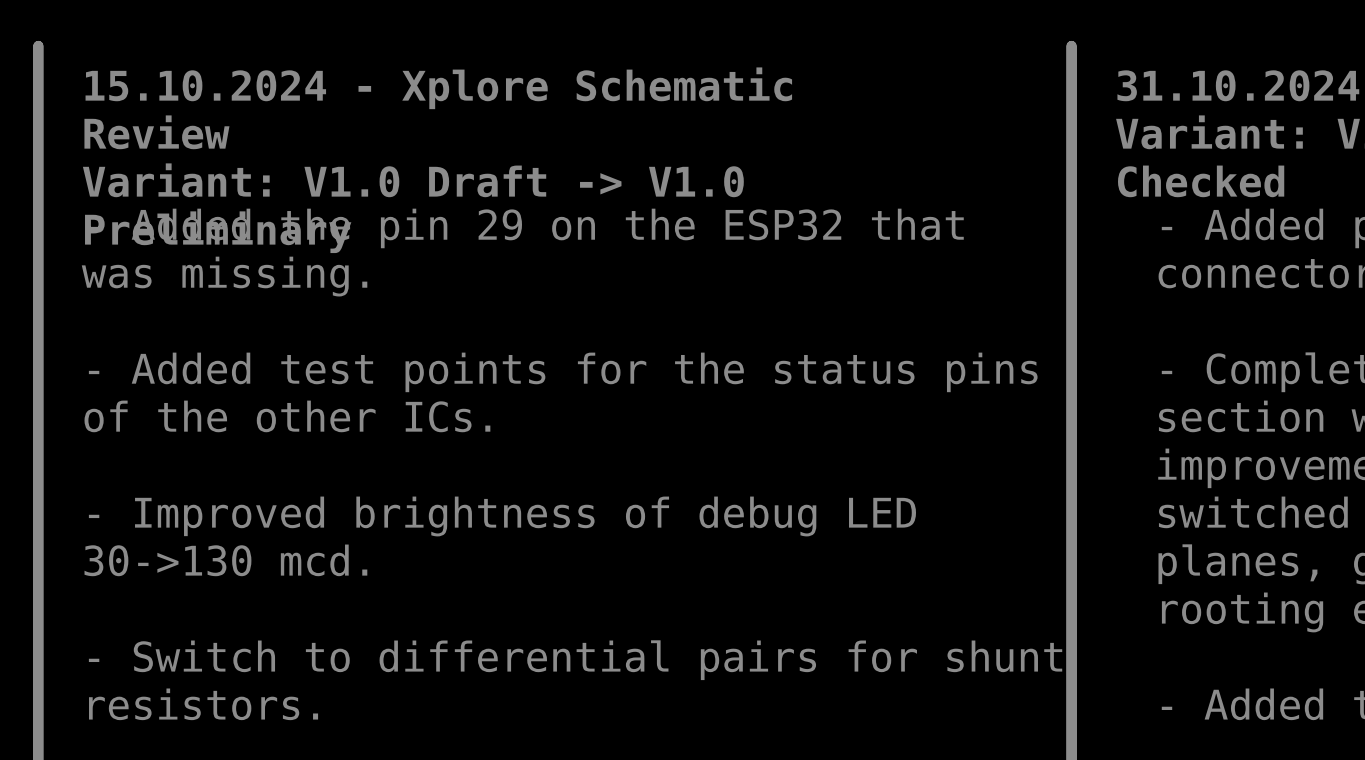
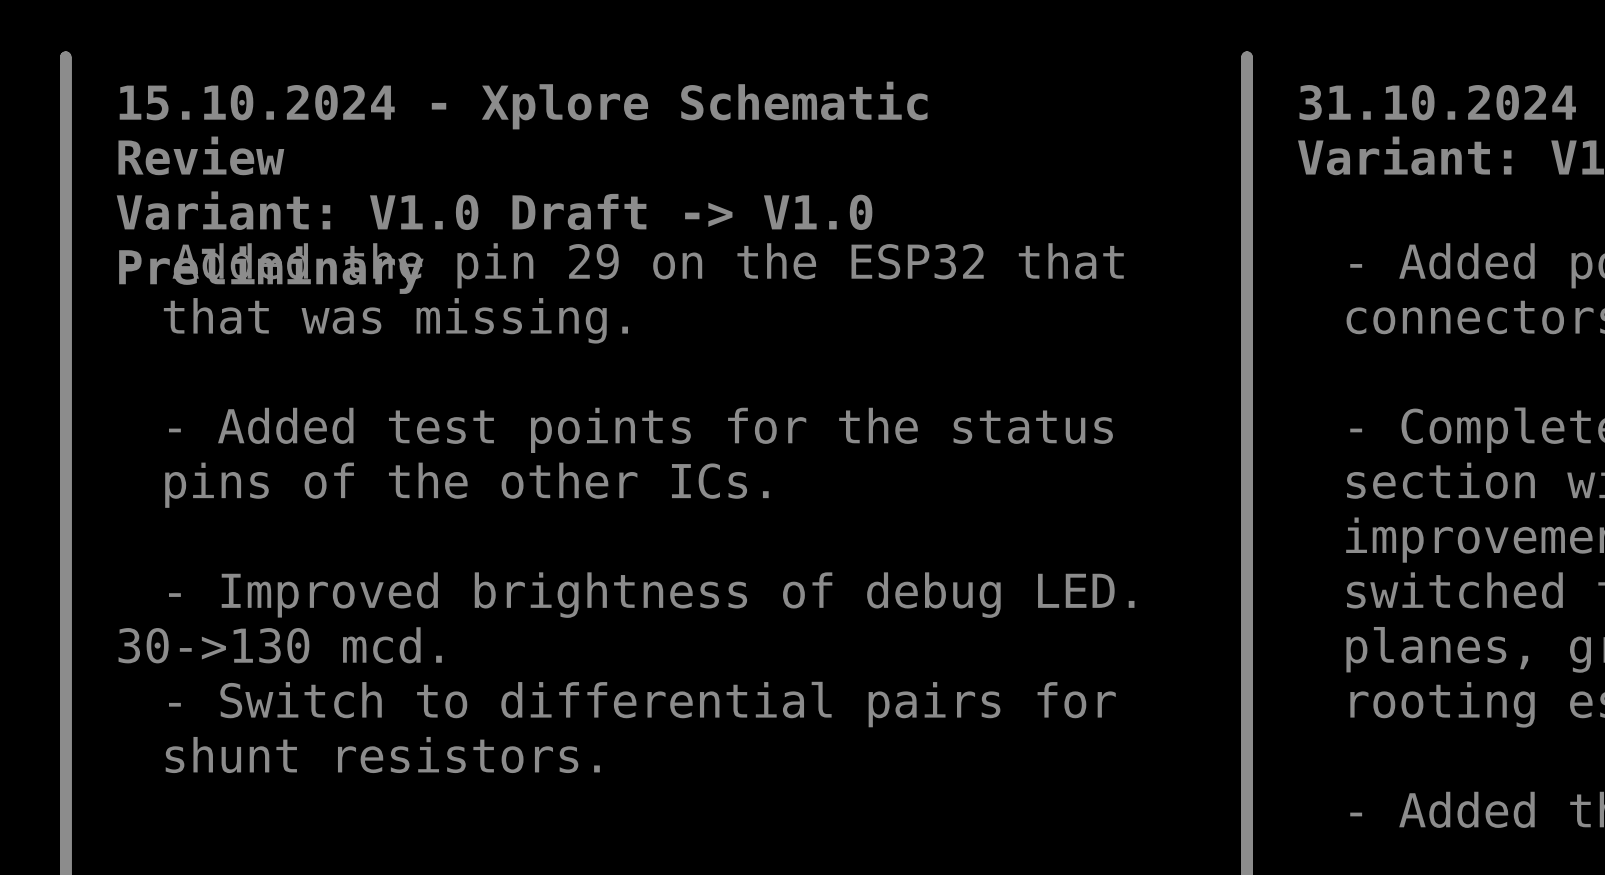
text: Checked (1201, 181) -> none
text: was missing. (224, 276) -> that was missing. (395, 320)
text: - Added test points for the status pins (563, 372) -> - Added test points for the status (640, 430)
text: of the other ICs. (287, 416) -> pins of the other ICs. (466, 485)
text: - Improved brightness of debug LED (502, 516) -> - Improved brightness of debug LED. (651, 595)
text: - Switch to differential pairs for shunt (575, 660) -> - Switch to differential pairs for (642, 704)
text: resistors. (203, 704) -> shunt resistors. (382, 755)

